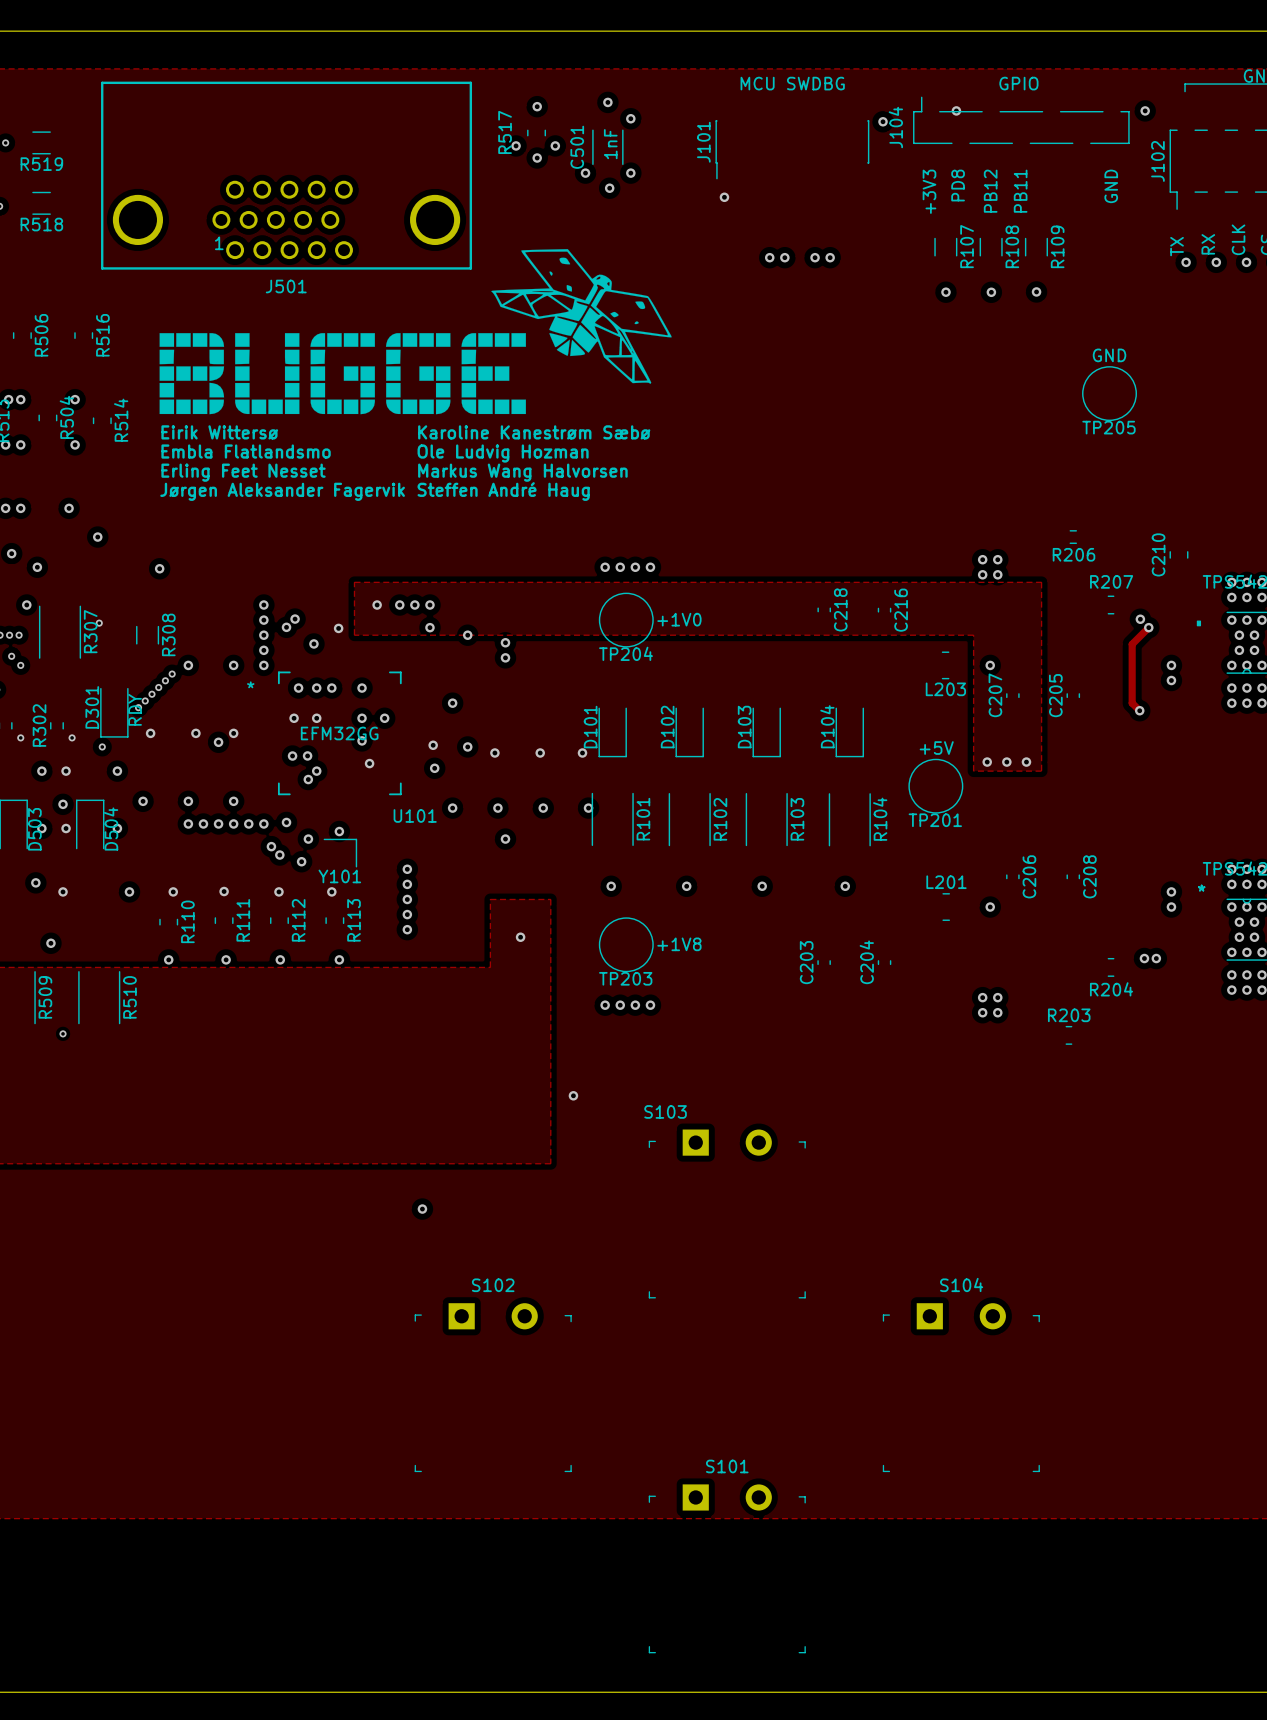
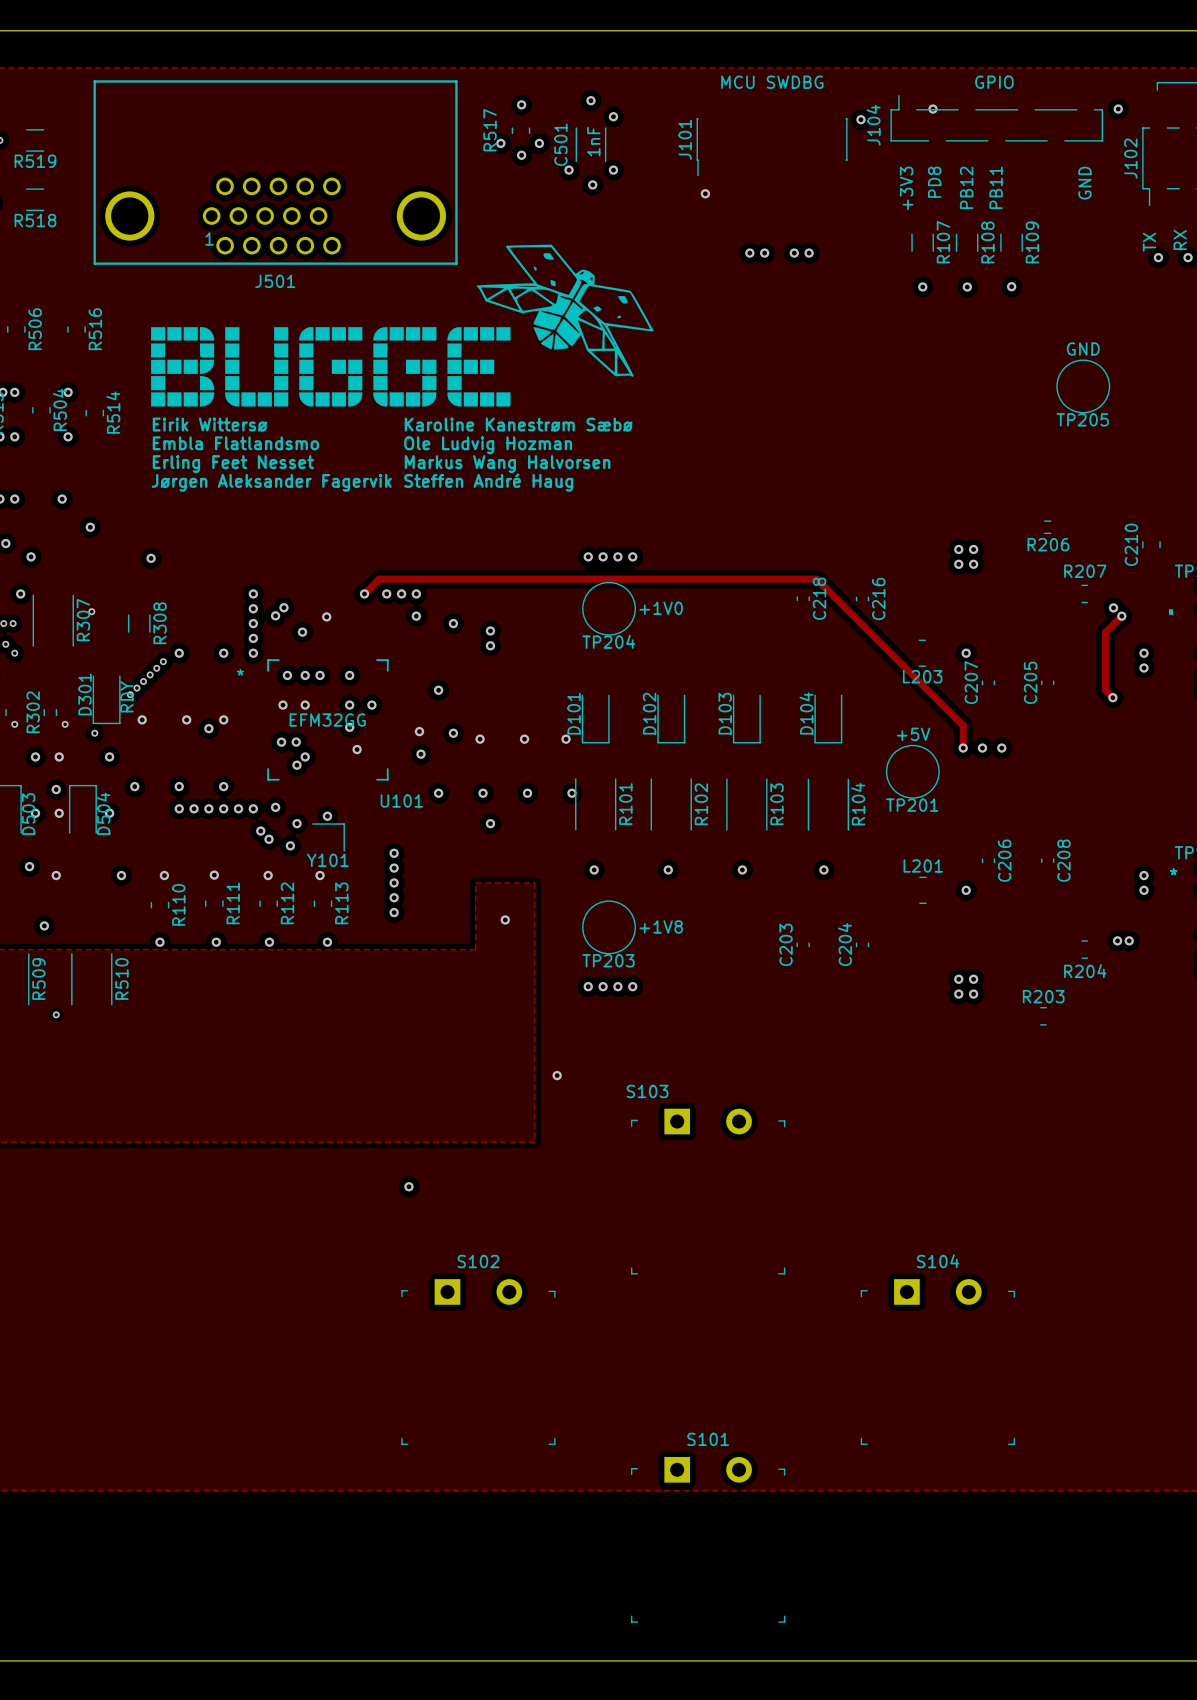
zone outline: (354, 582) (354, 635) (973, 635) (973, 771) (1041, 771) (1041, 582) (354, 582) -> none
track: none -> (364, 593) (379, 579) (816, 579) (963, 725) (963, 748)

